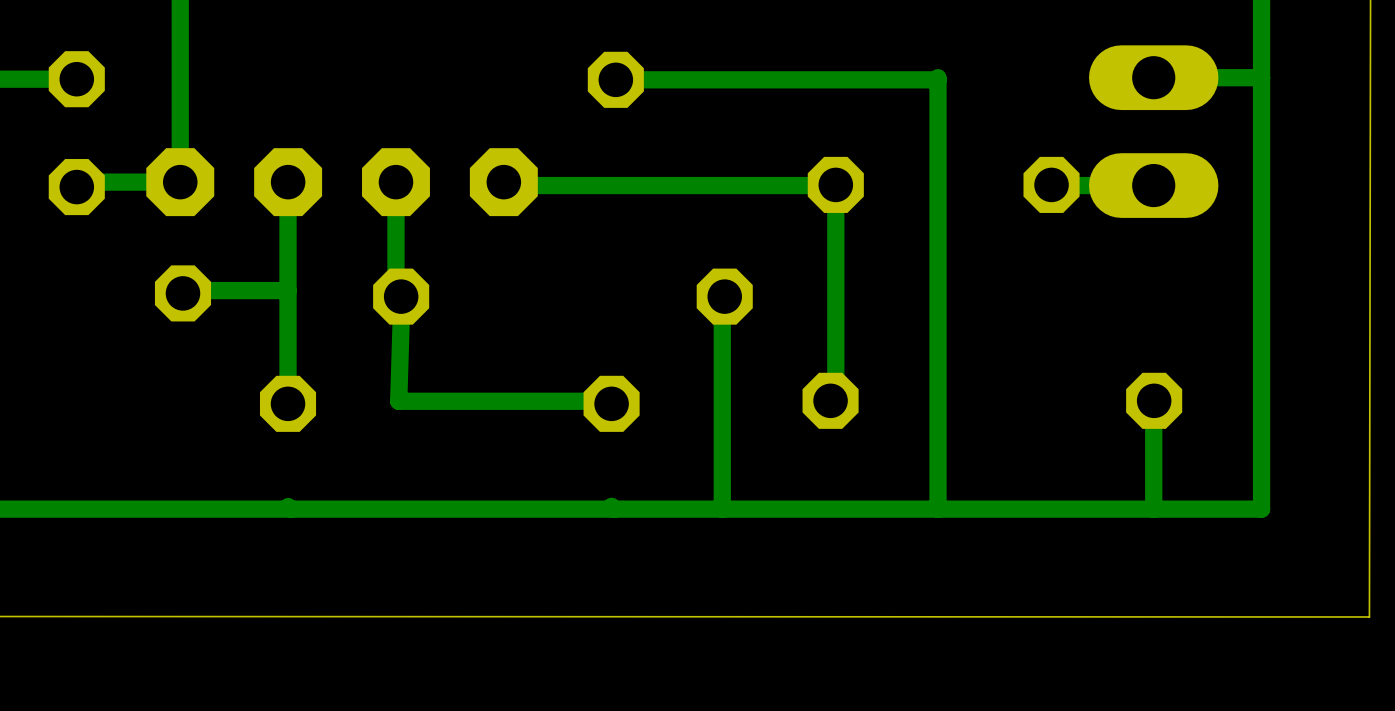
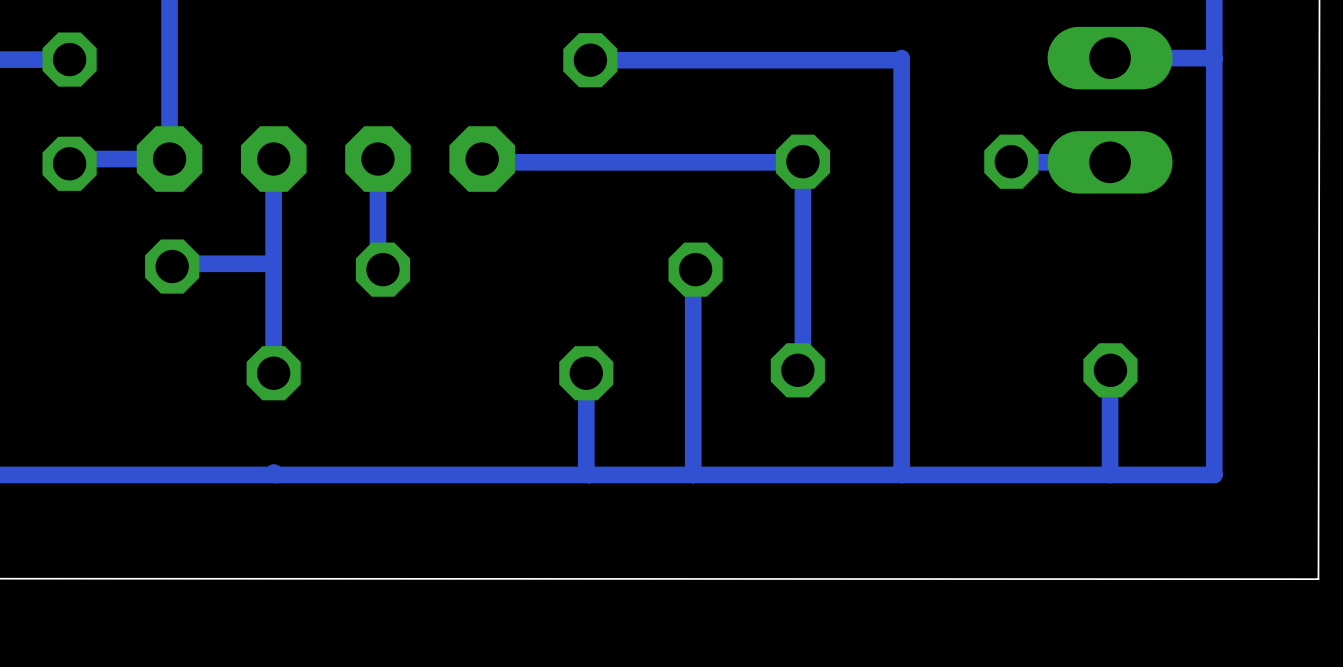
bottom track: (401, 296) (398, 401) (609, 401) (614, 403) -> none
bottom track: none -> (586, 373) (586, 472)

